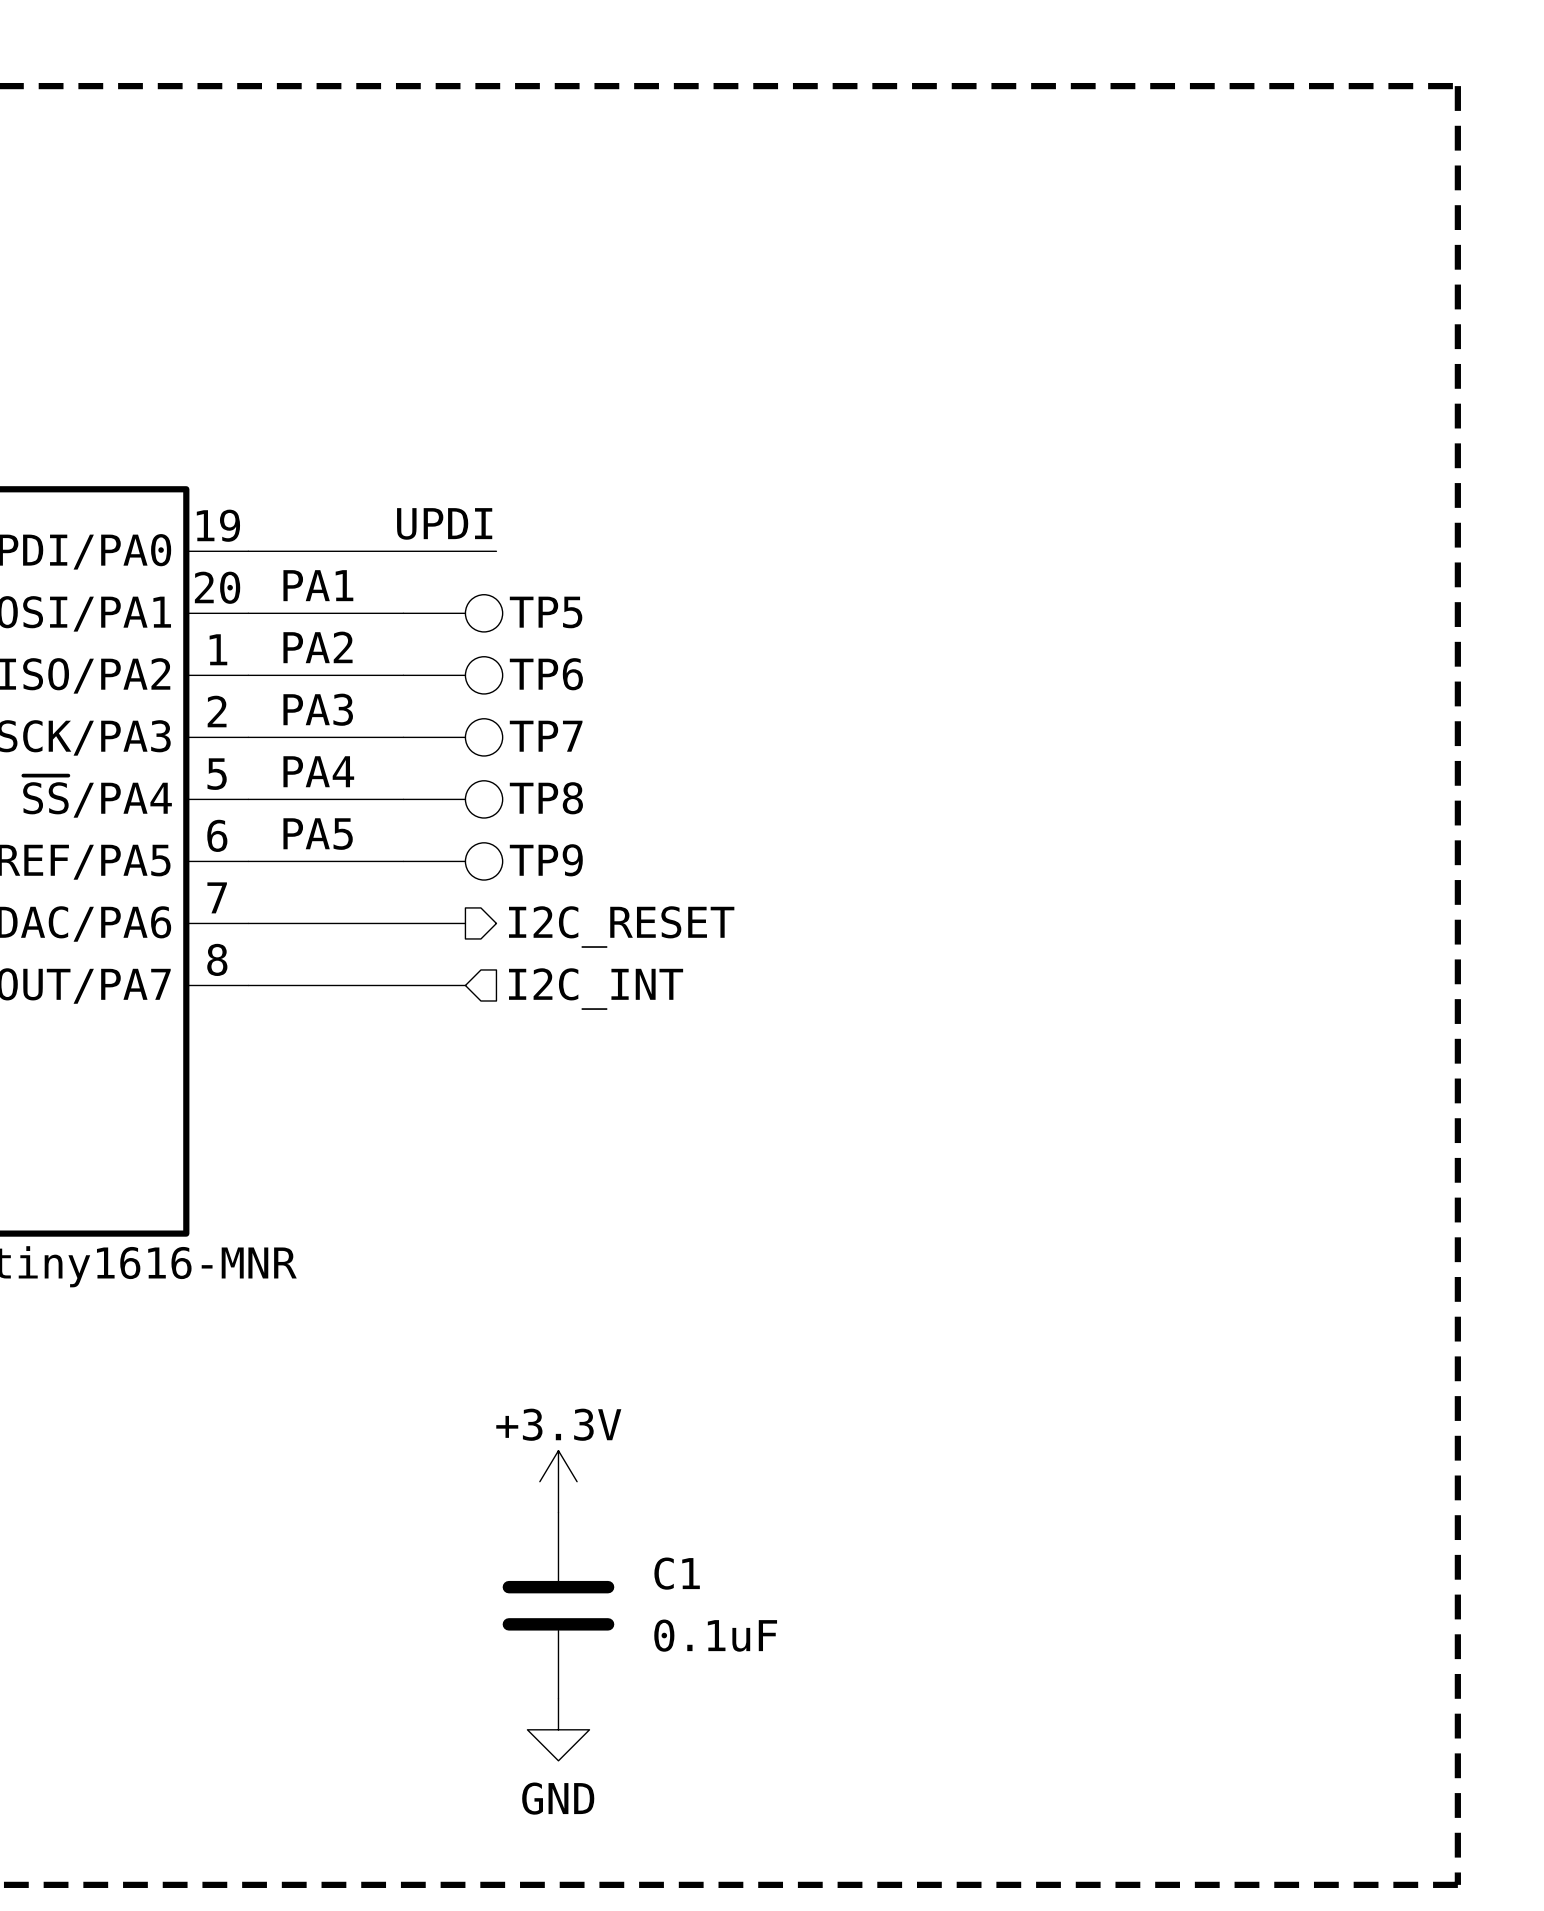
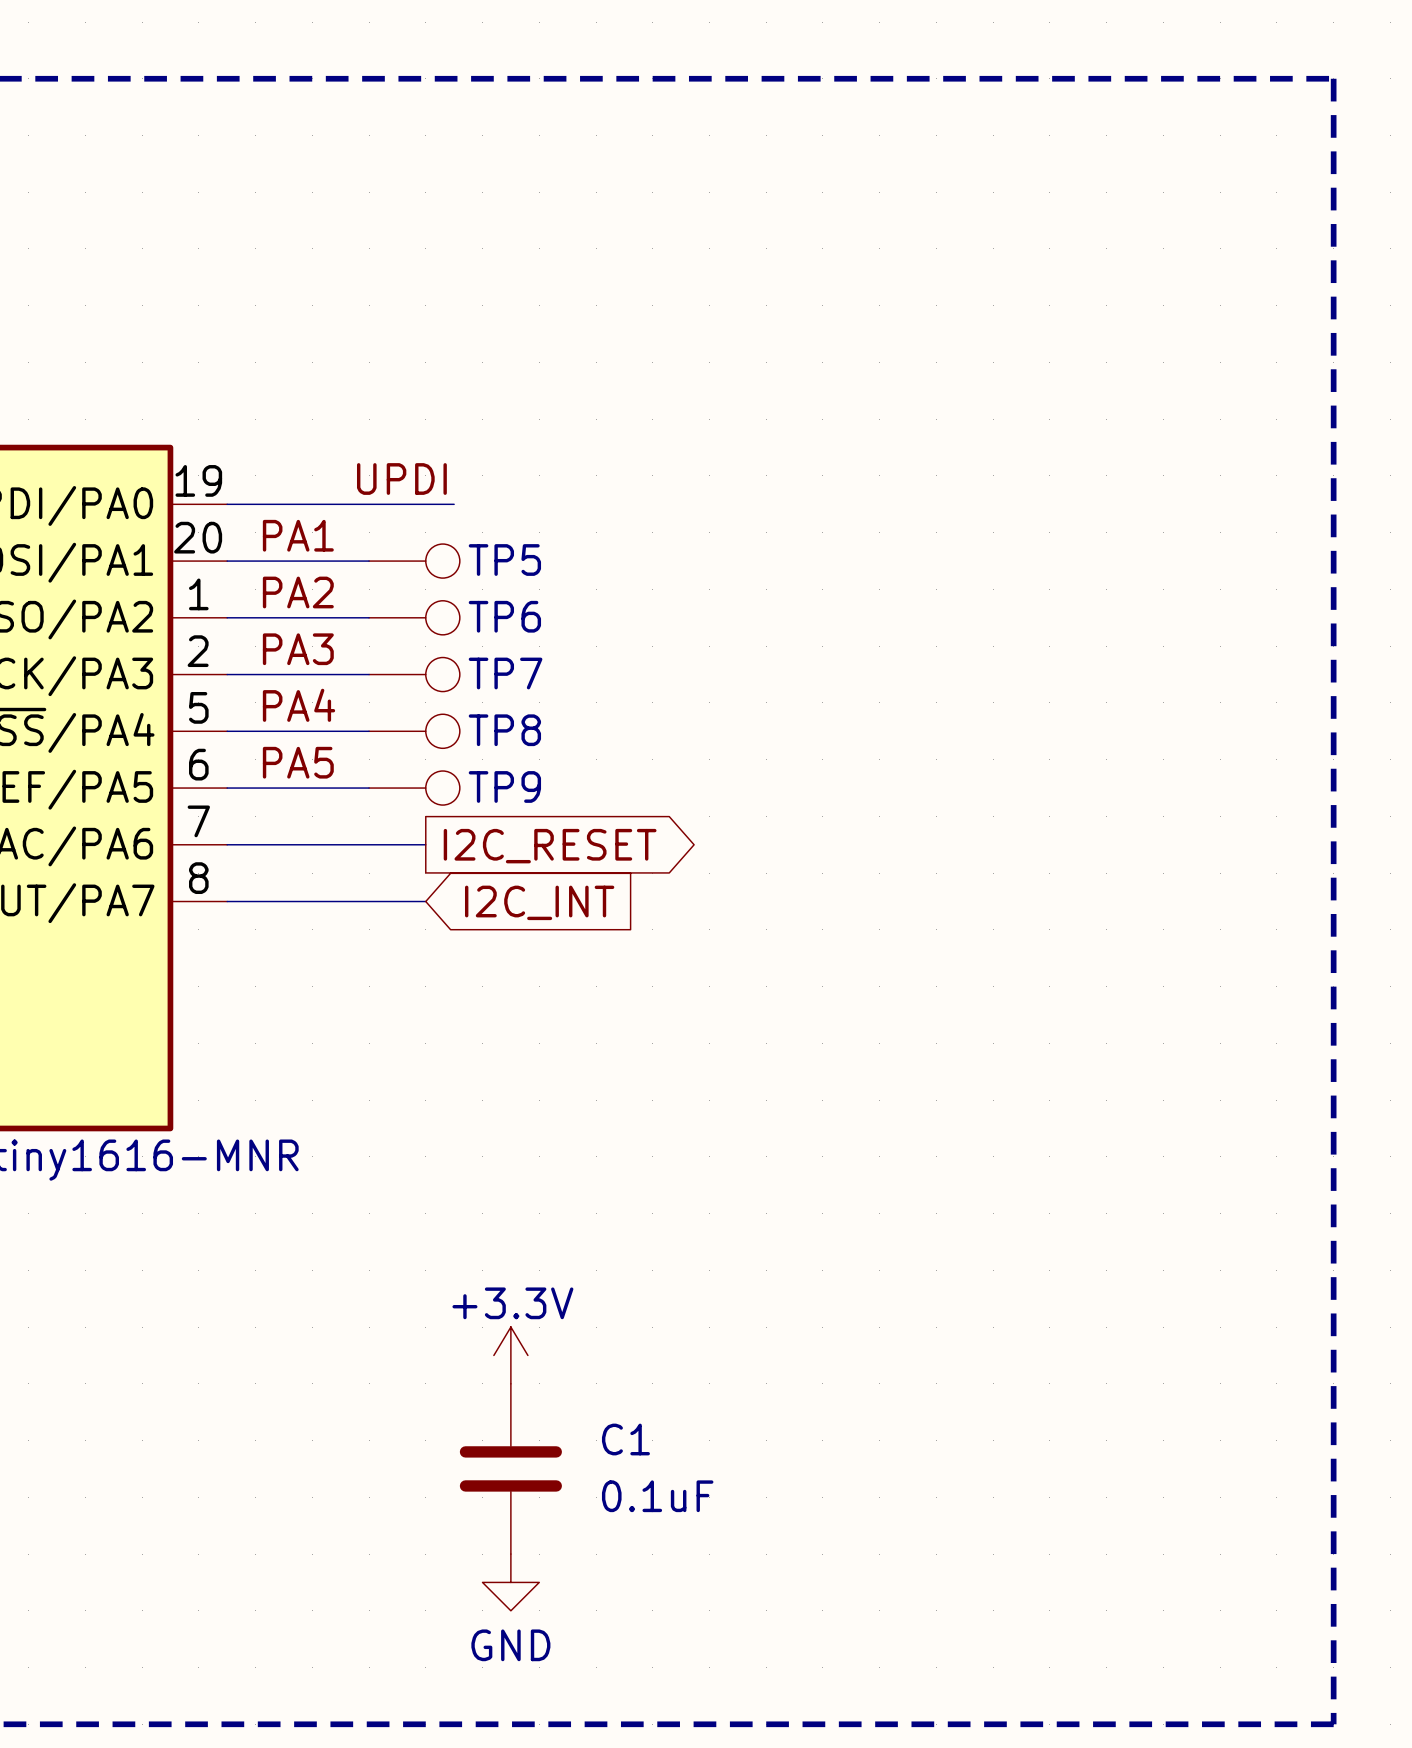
hierarchical label: I2C_RESET (621, 927) -> none
global label: none -> I2C_RESET (550, 846)
hierarchical label: I2C_INT (596, 989) -> none
global label: none -> I2C_INT (539, 902)

